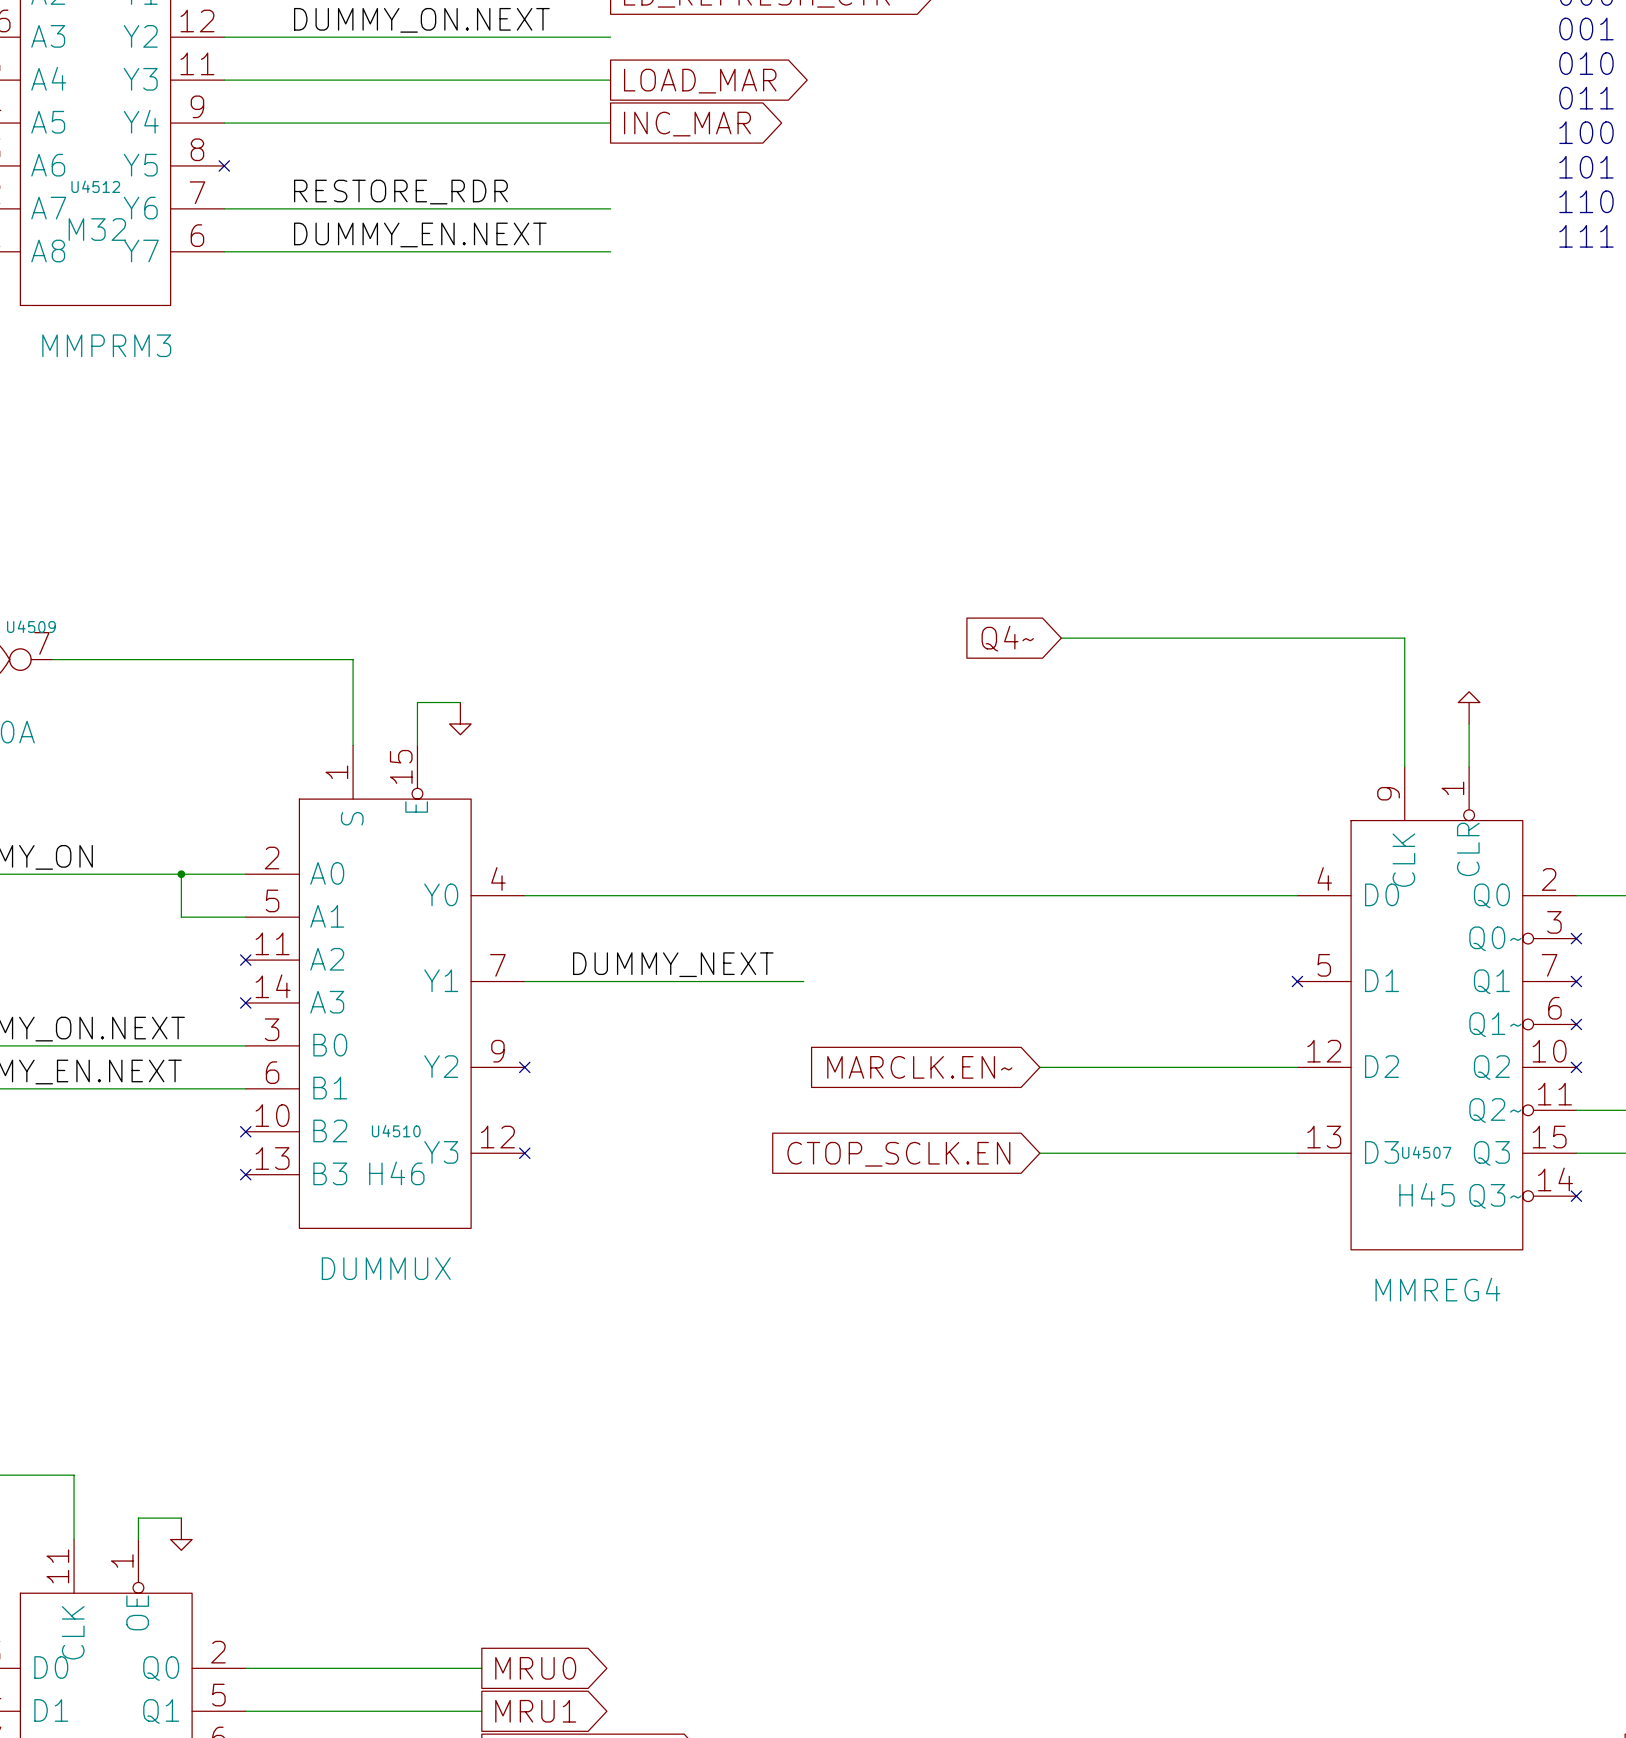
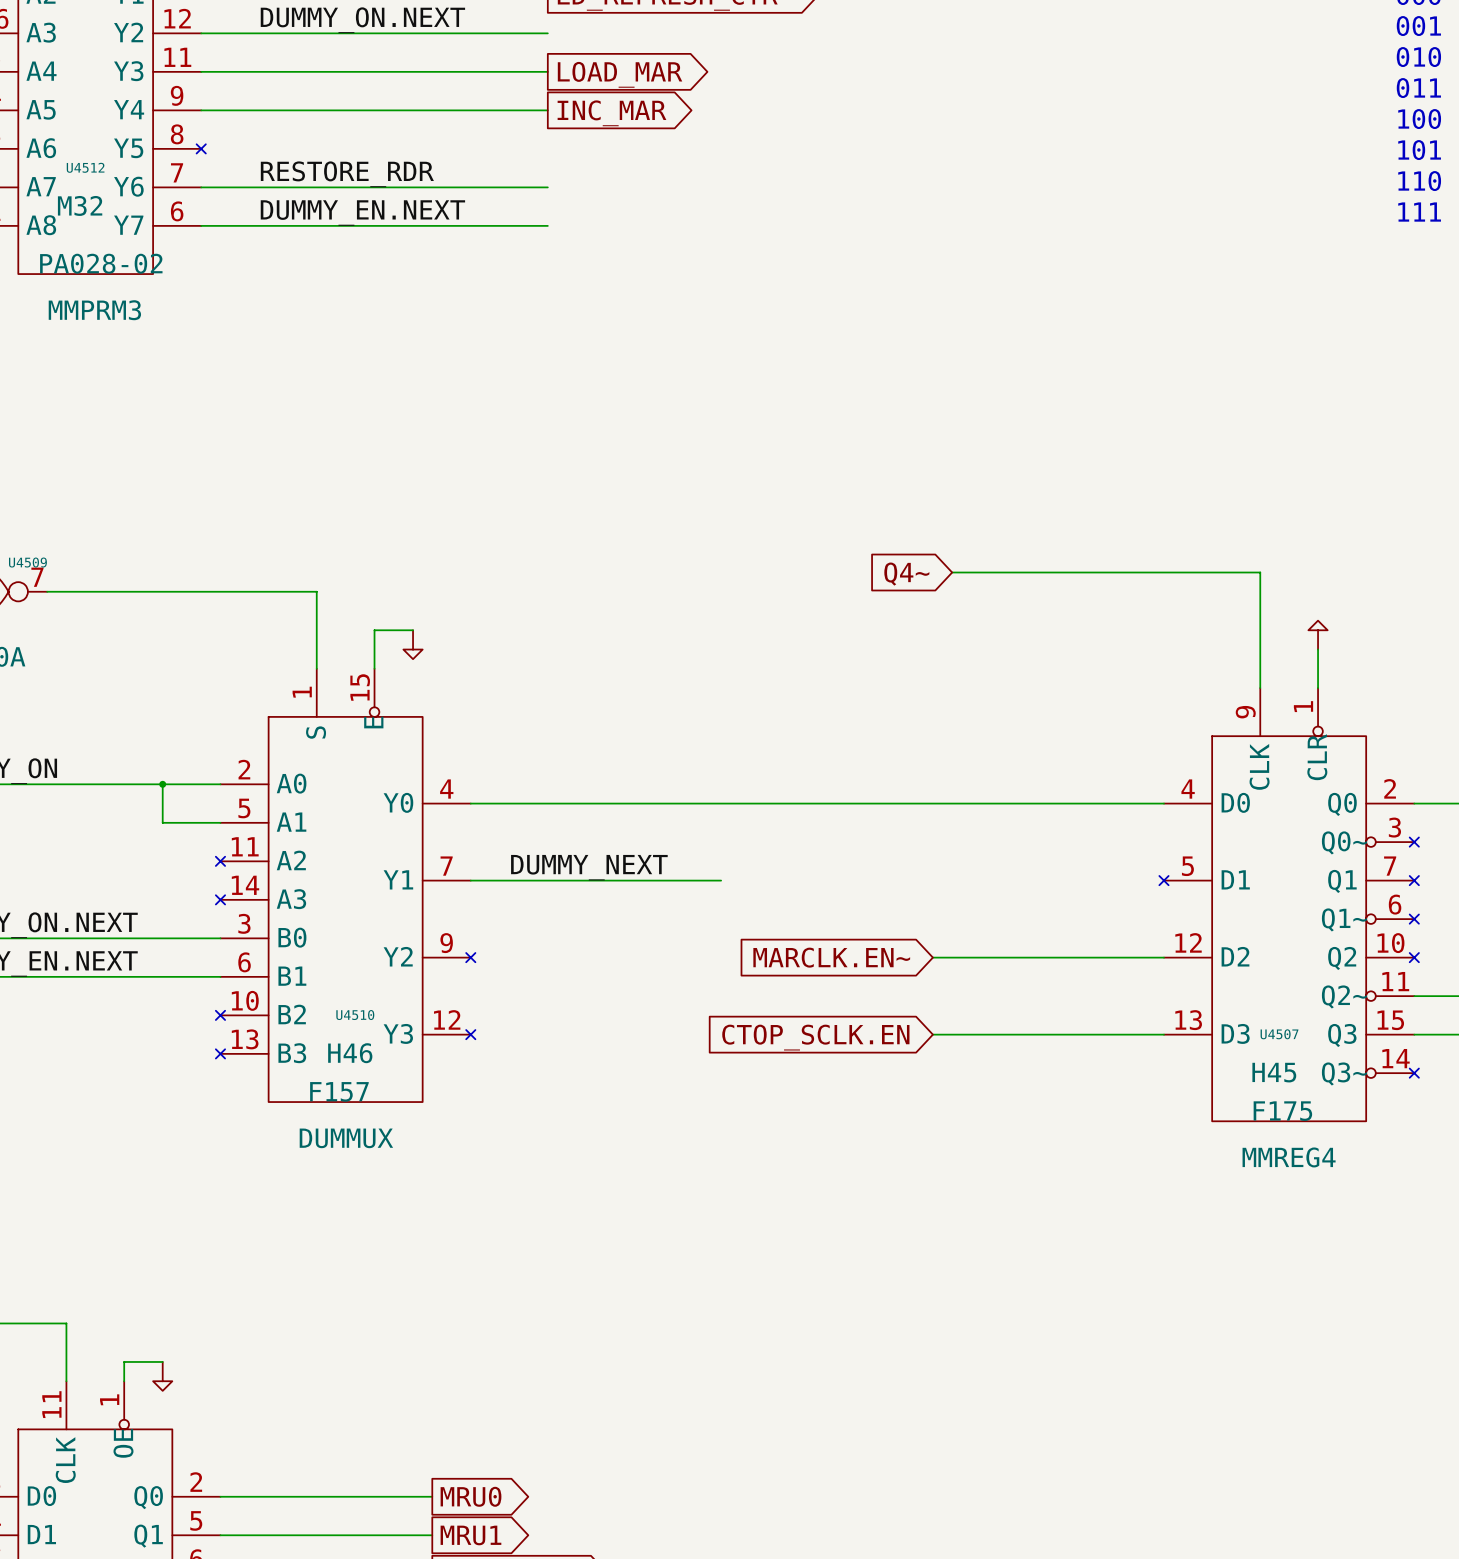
U4512 value: none -> PA028-02 (101, 263)
U4510 value: none -> F157 (339, 1091)
U4507 value: none -> F175 (1282, 1111)

